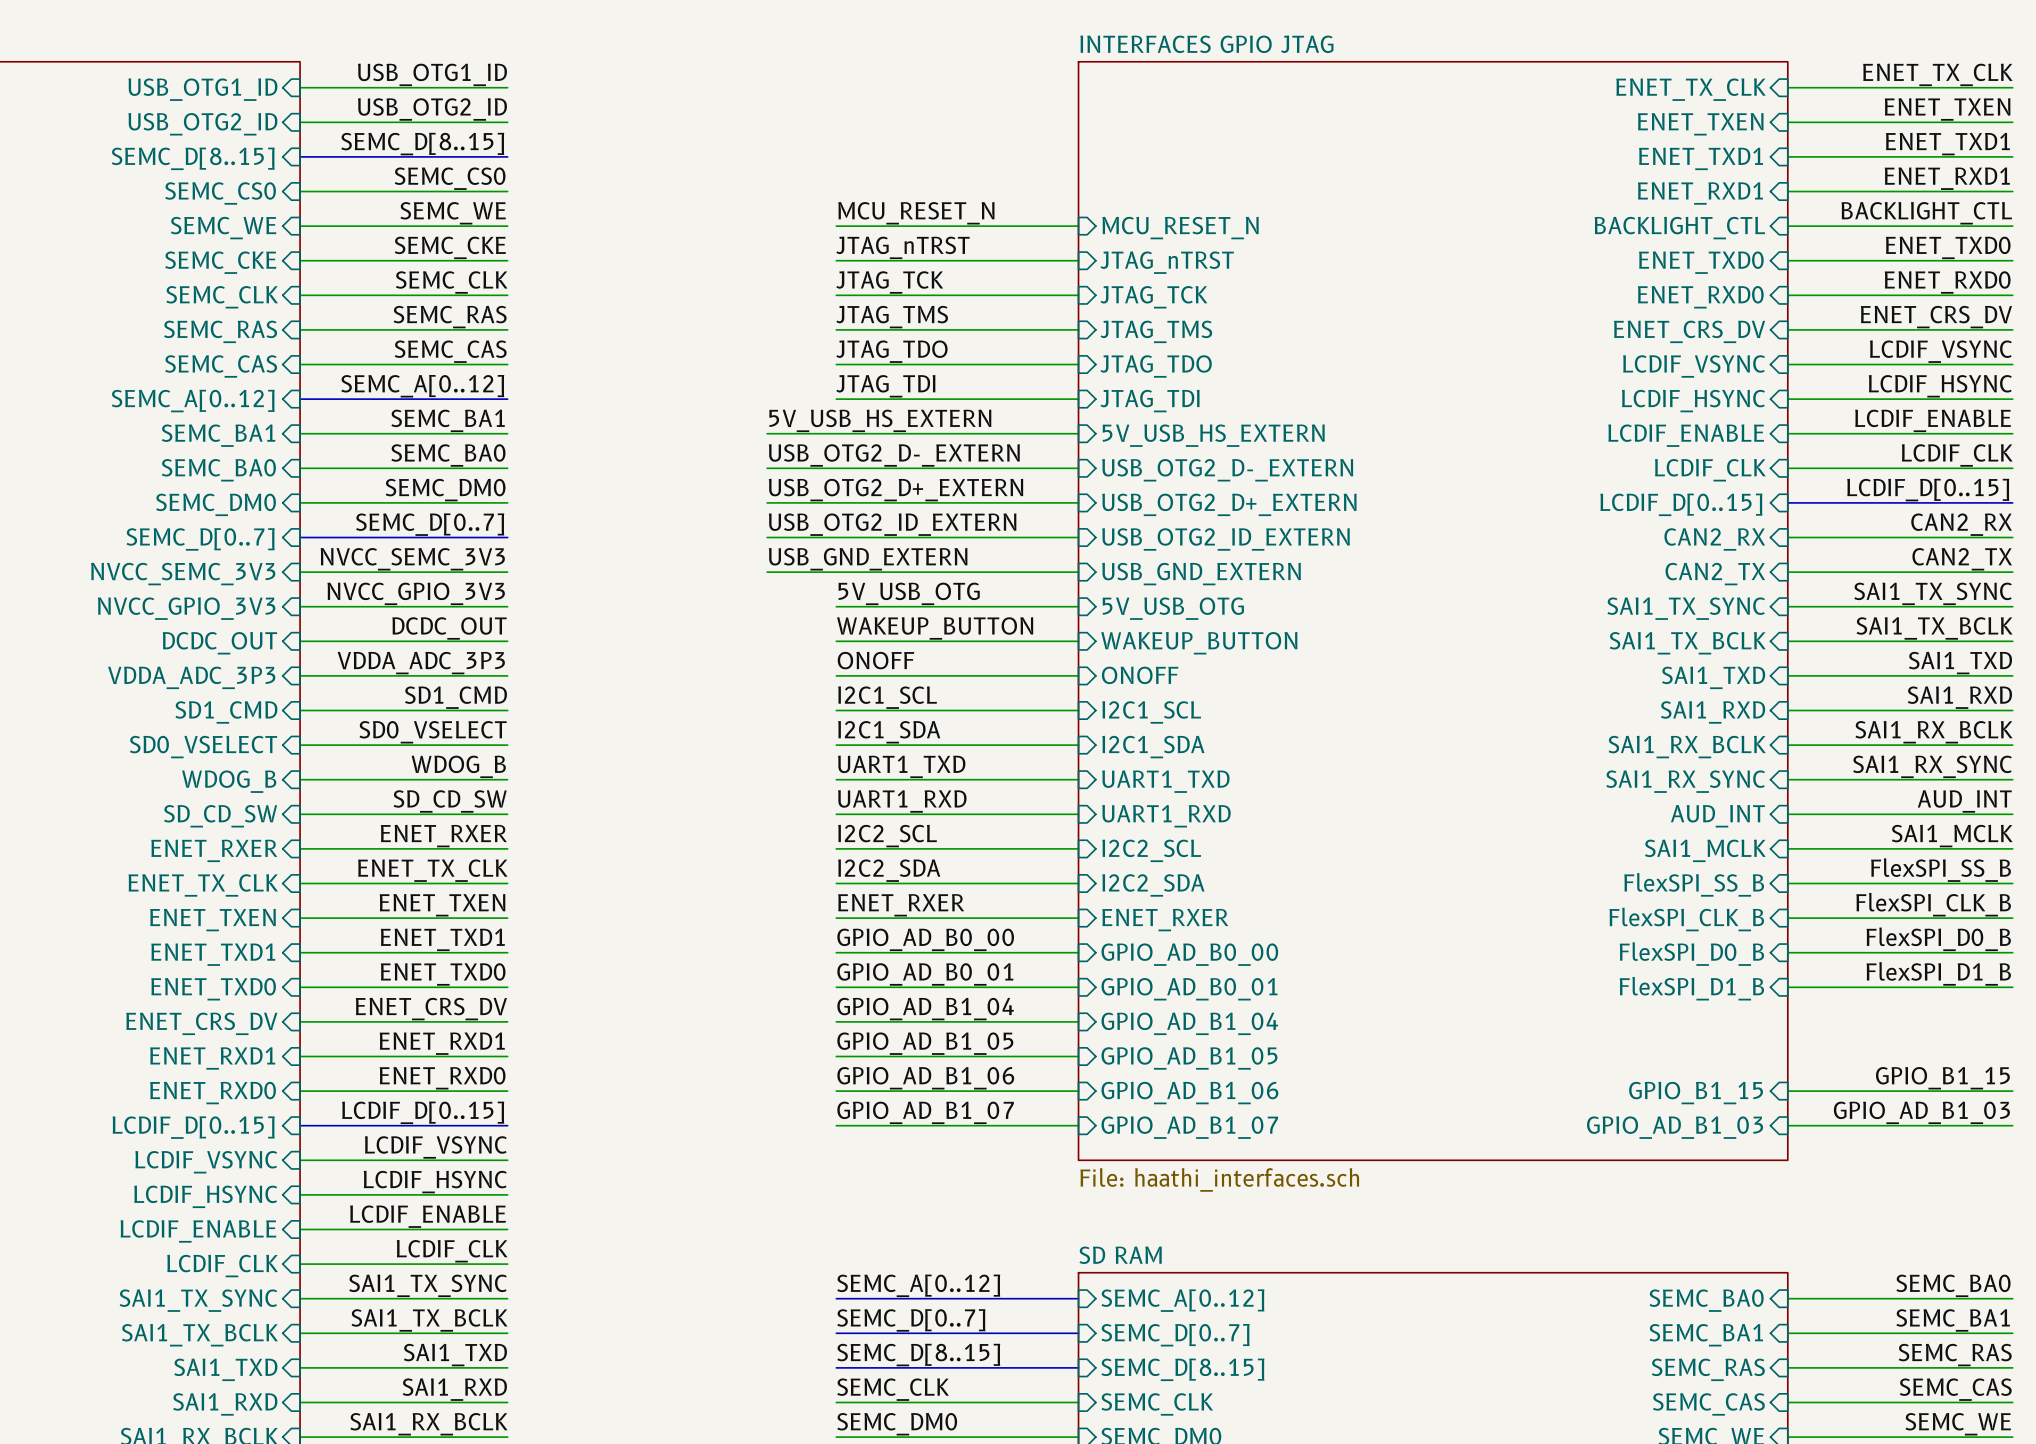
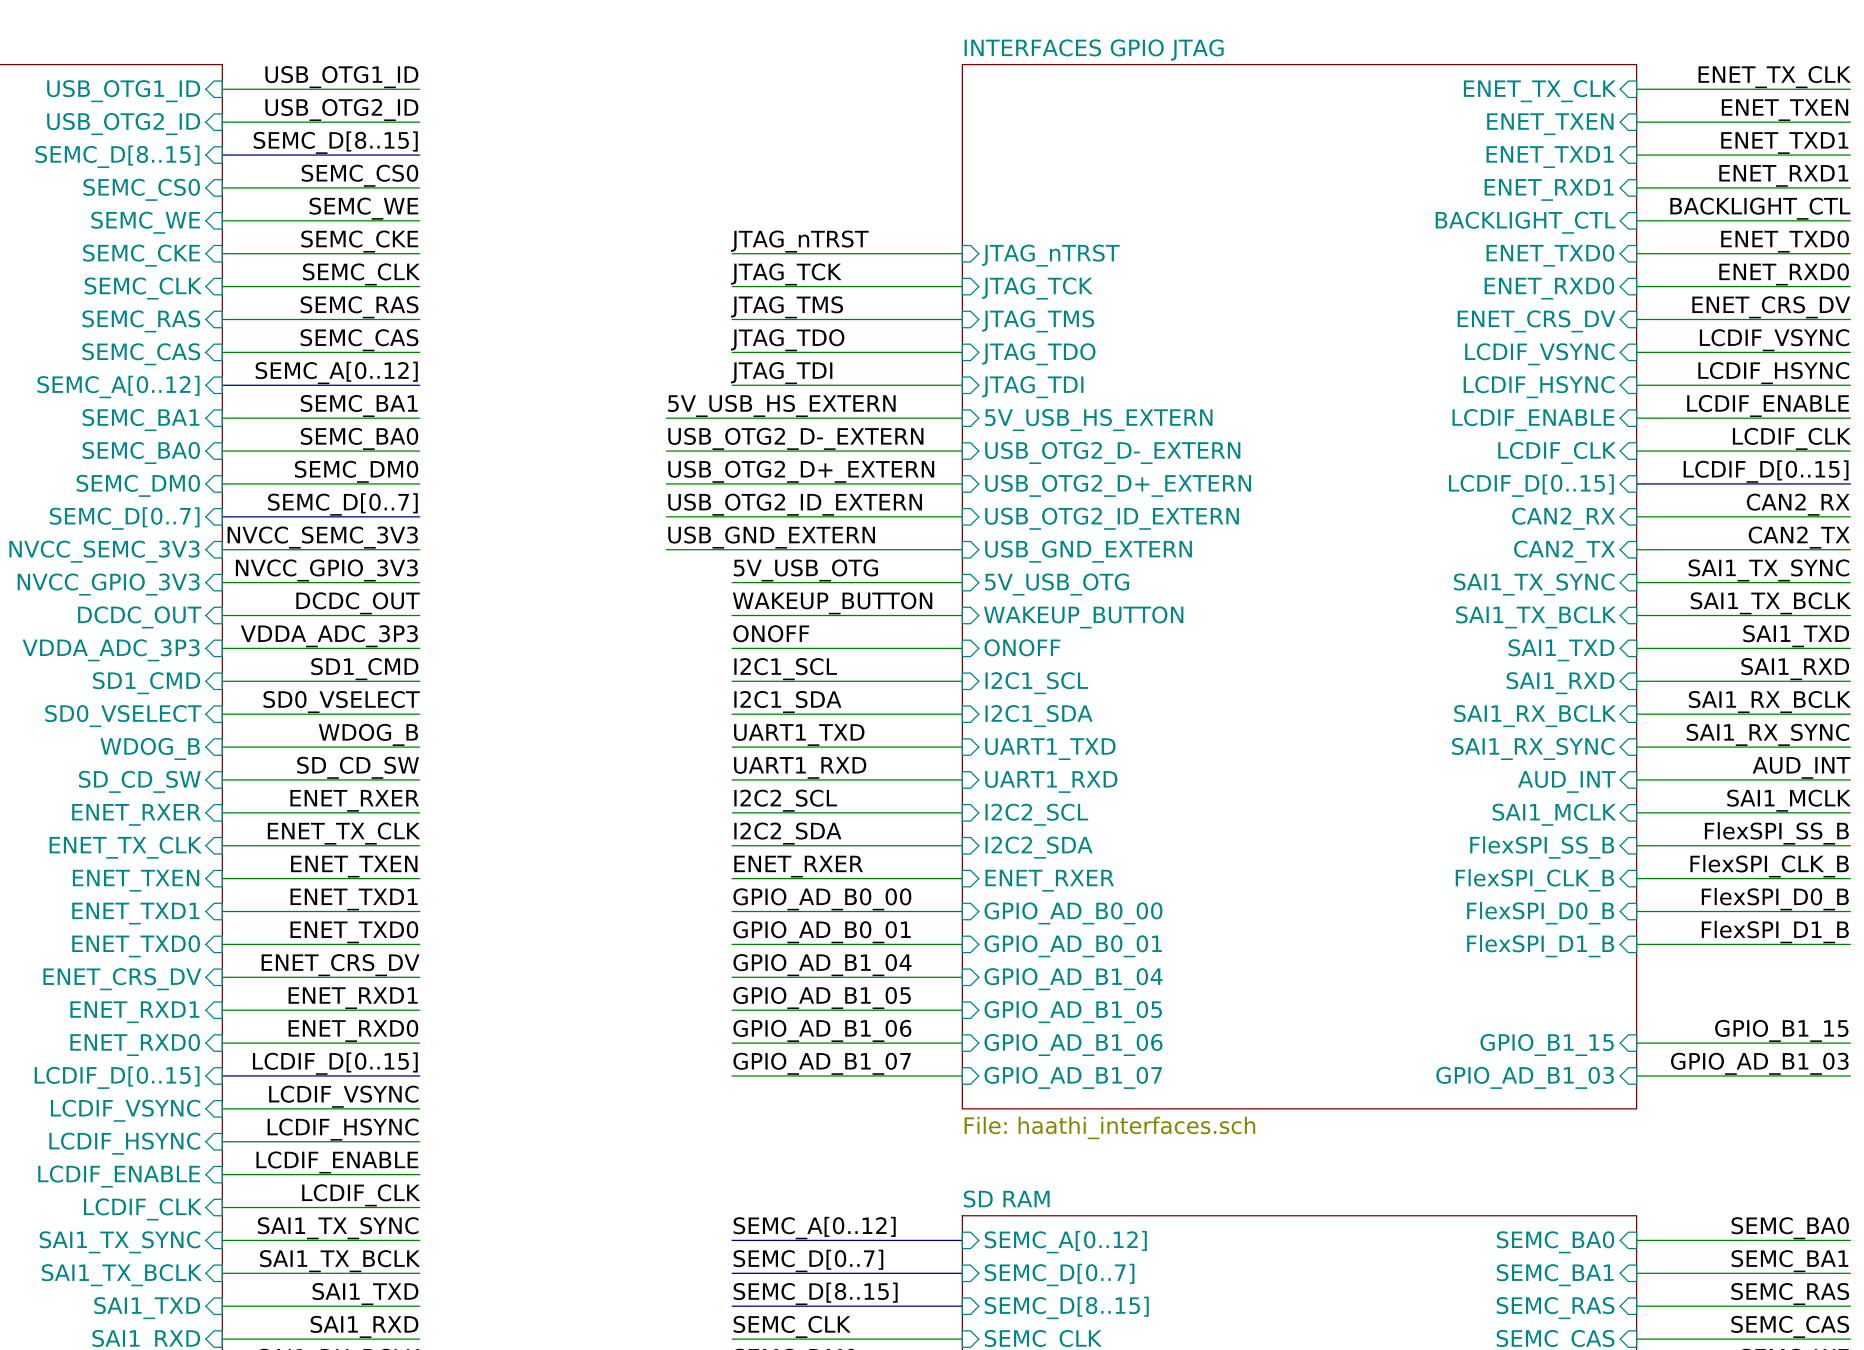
label: MCU_RESET_N (916, 213) -> none
wire: (836, 226) (1078, 226) -> none
sheet pin: MCU_RESET_N (1180, 228) -> none

